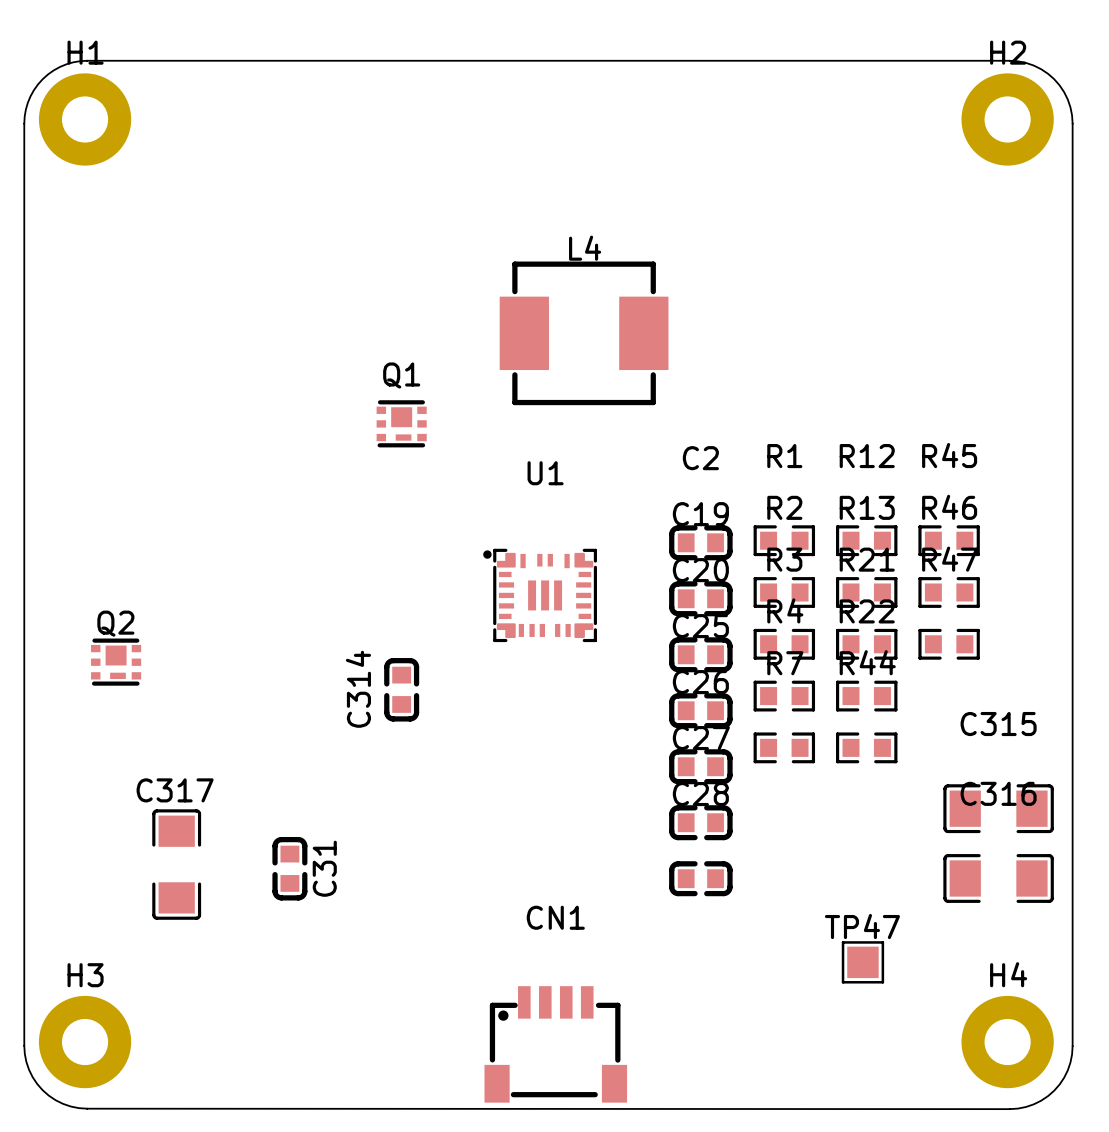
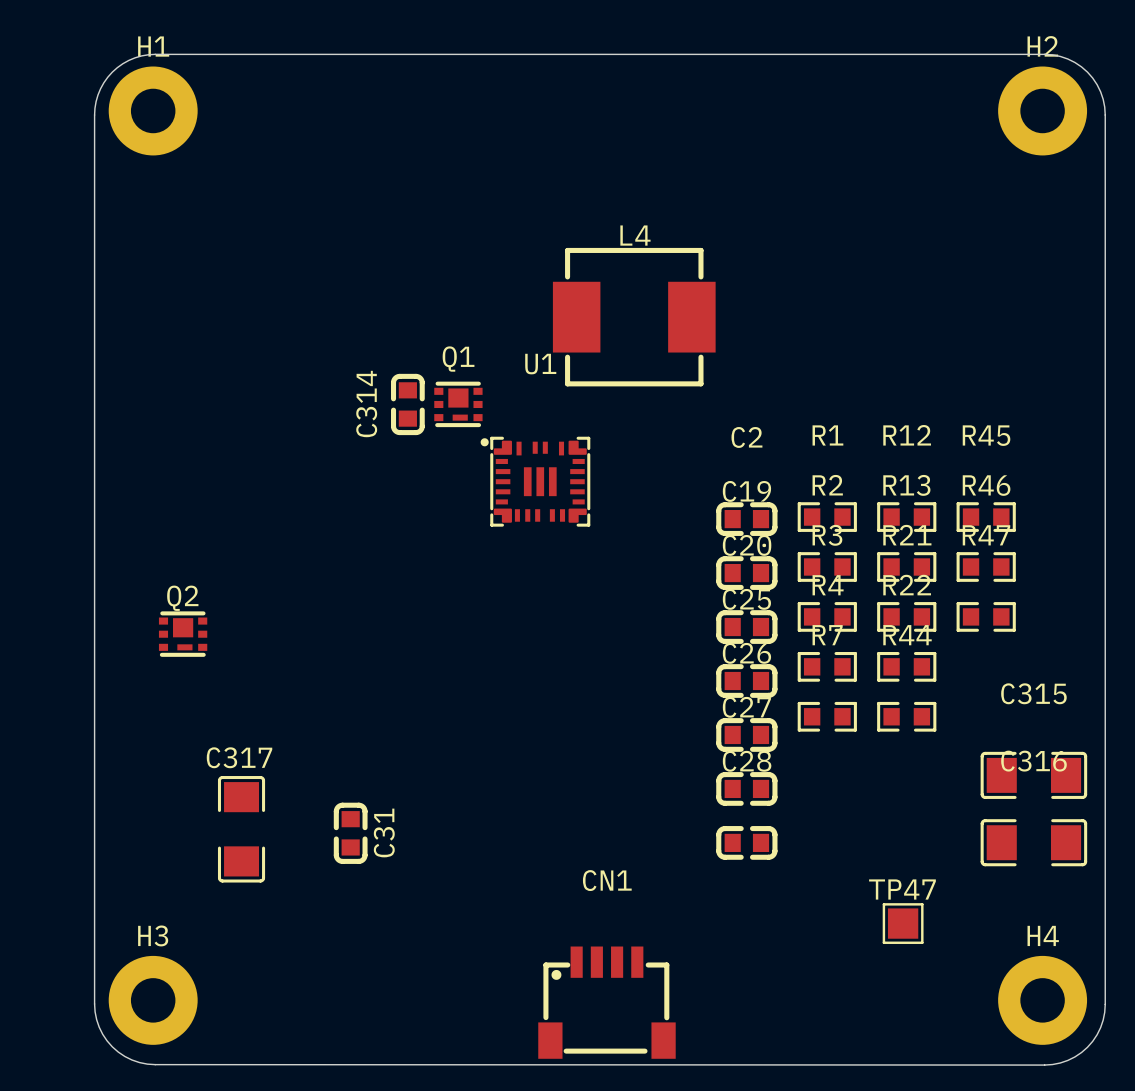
U1 position: (540, 595) -> (535, 481)
C314 position: (401, 689) -> (407, 404)

